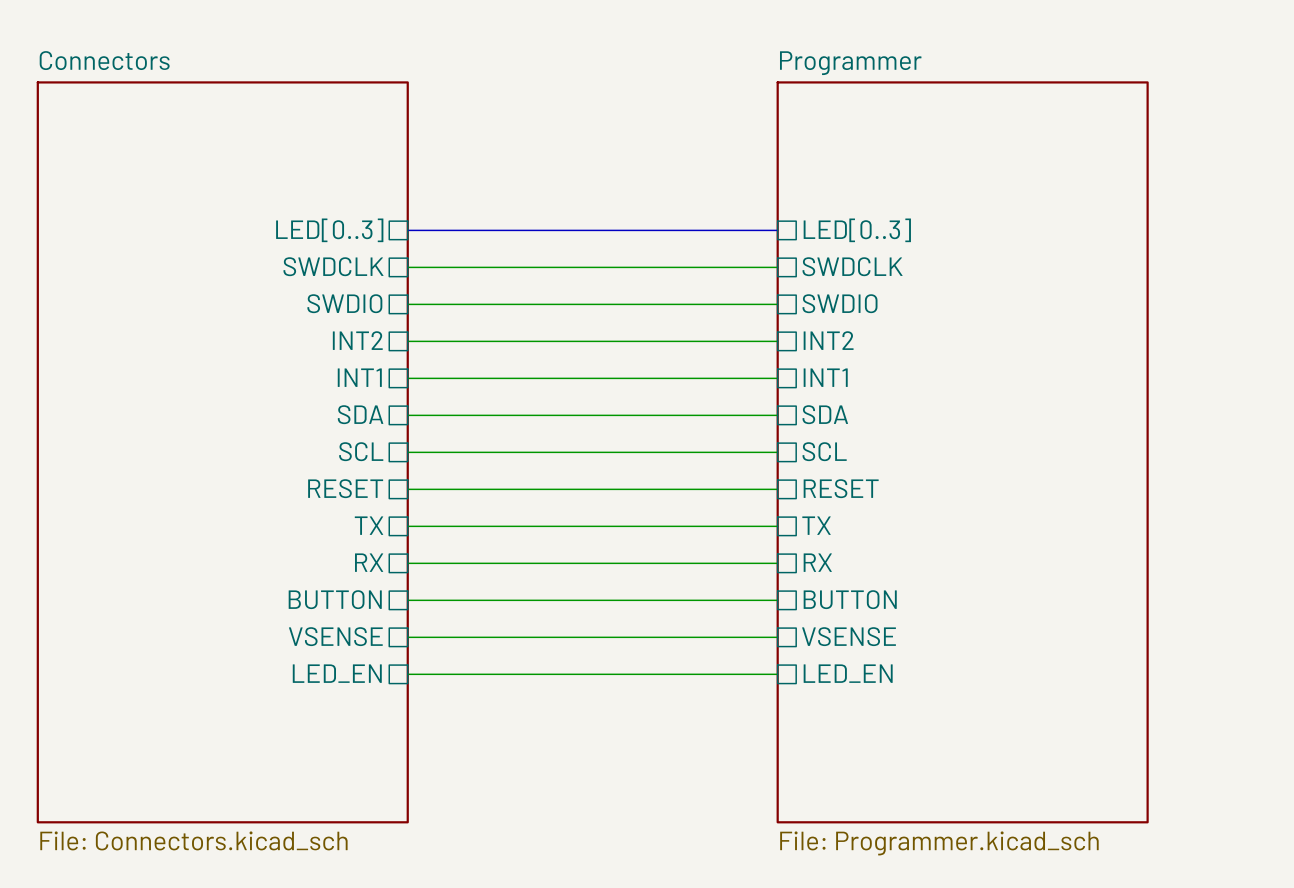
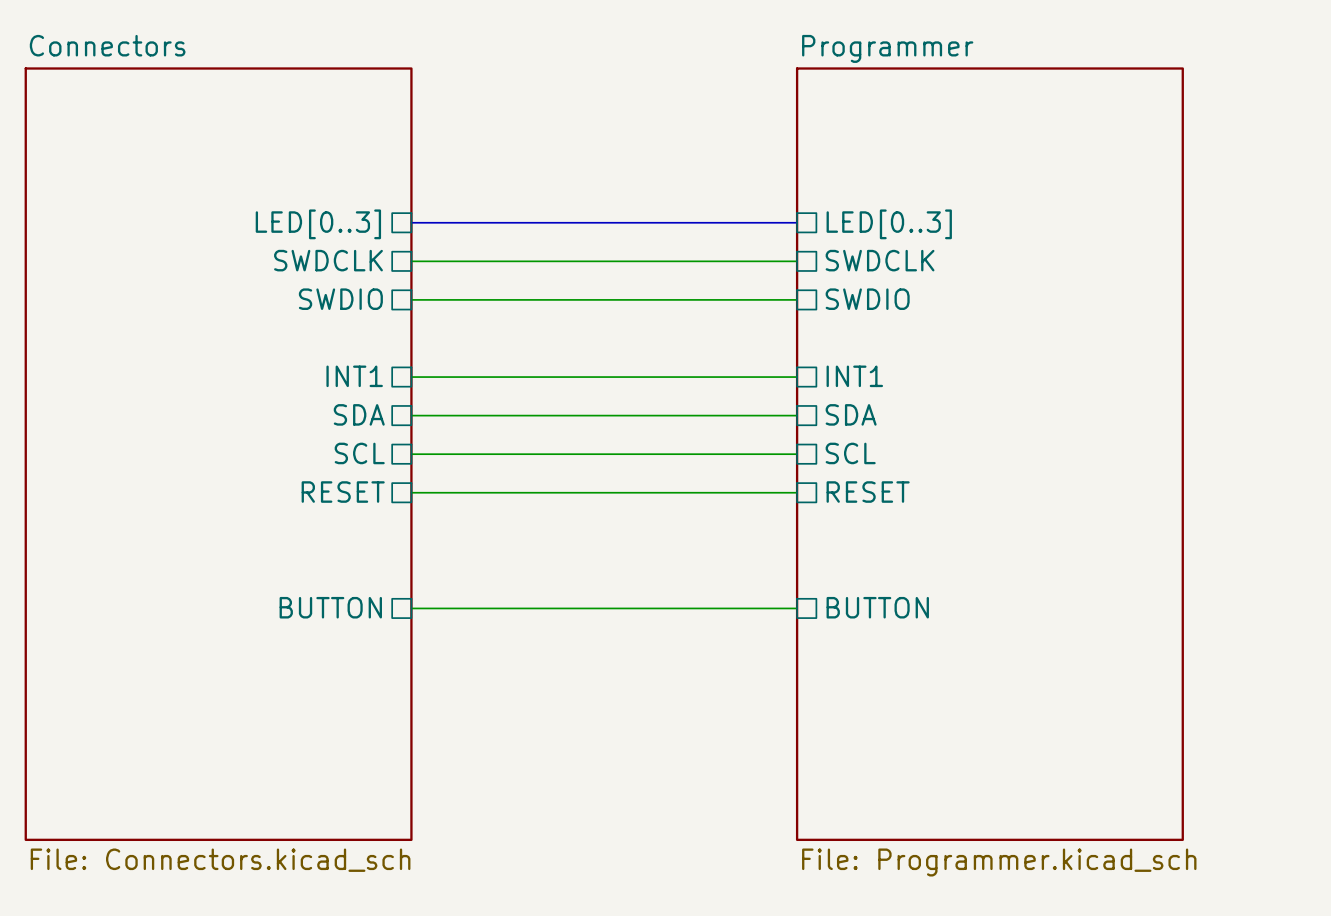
sheet pin: INT2 (357, 340) -> none
sheet pin: INT2 (828, 340) -> none
wire: (407, 341) (777, 341) -> none
sheet pin: TX (369, 525) -> none
sheet pin: TX (816, 525) -> none
wire: (407, 526) (777, 526) -> none
sheet pin: RX (369, 562) -> none
sheet pin: RX (817, 562) -> none
wire: (407, 563) (777, 563) -> none
sheet pin: VSENSE (335, 636) -> none
sheet pin: VSENSE (849, 636) -> none
wire: (407, 637) (777, 637) -> none
sheet pin: LED_EN (337, 673) -> none
sheet pin: LED_EN (848, 673) -> none
wire: (407, 674) (777, 674) -> none

